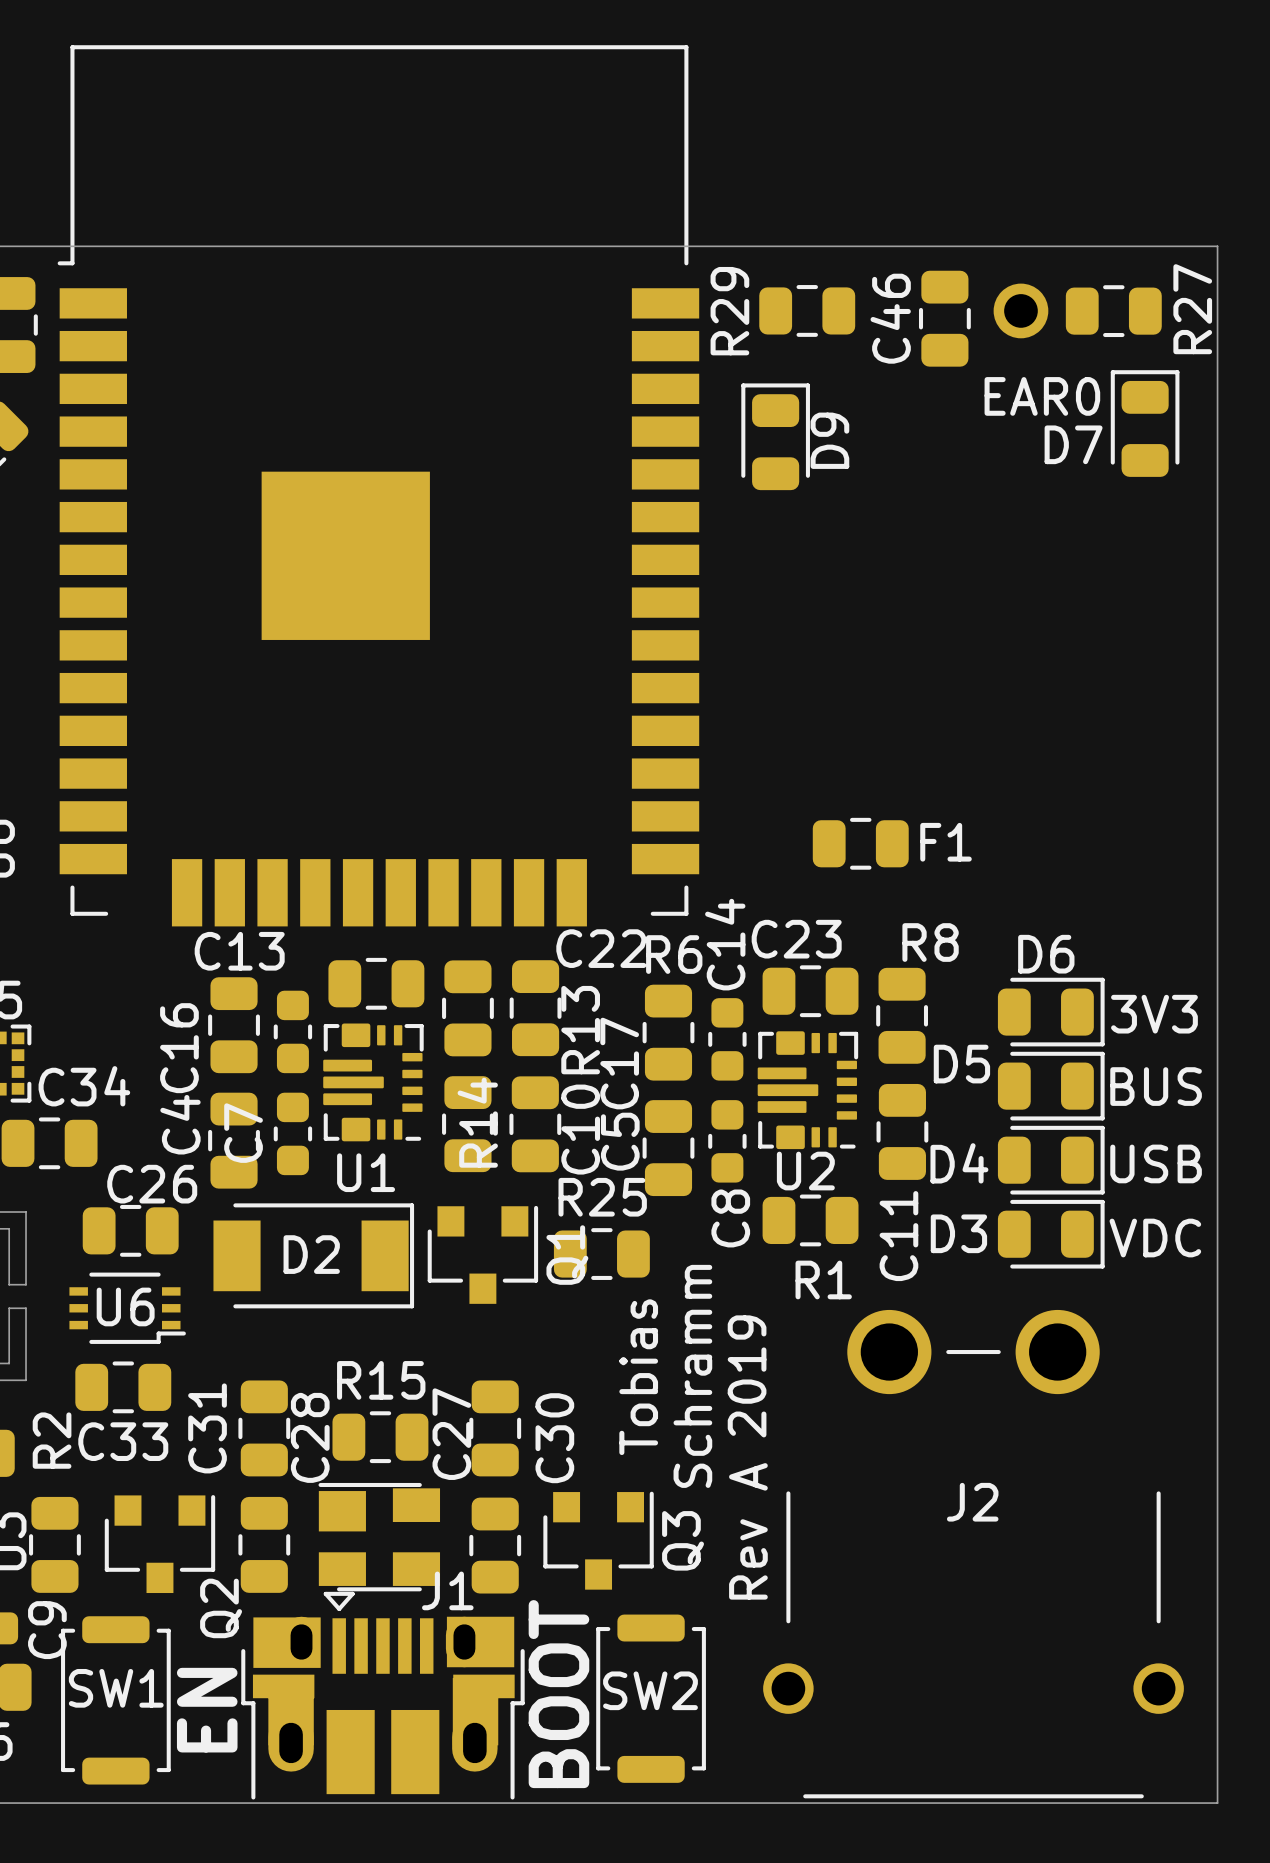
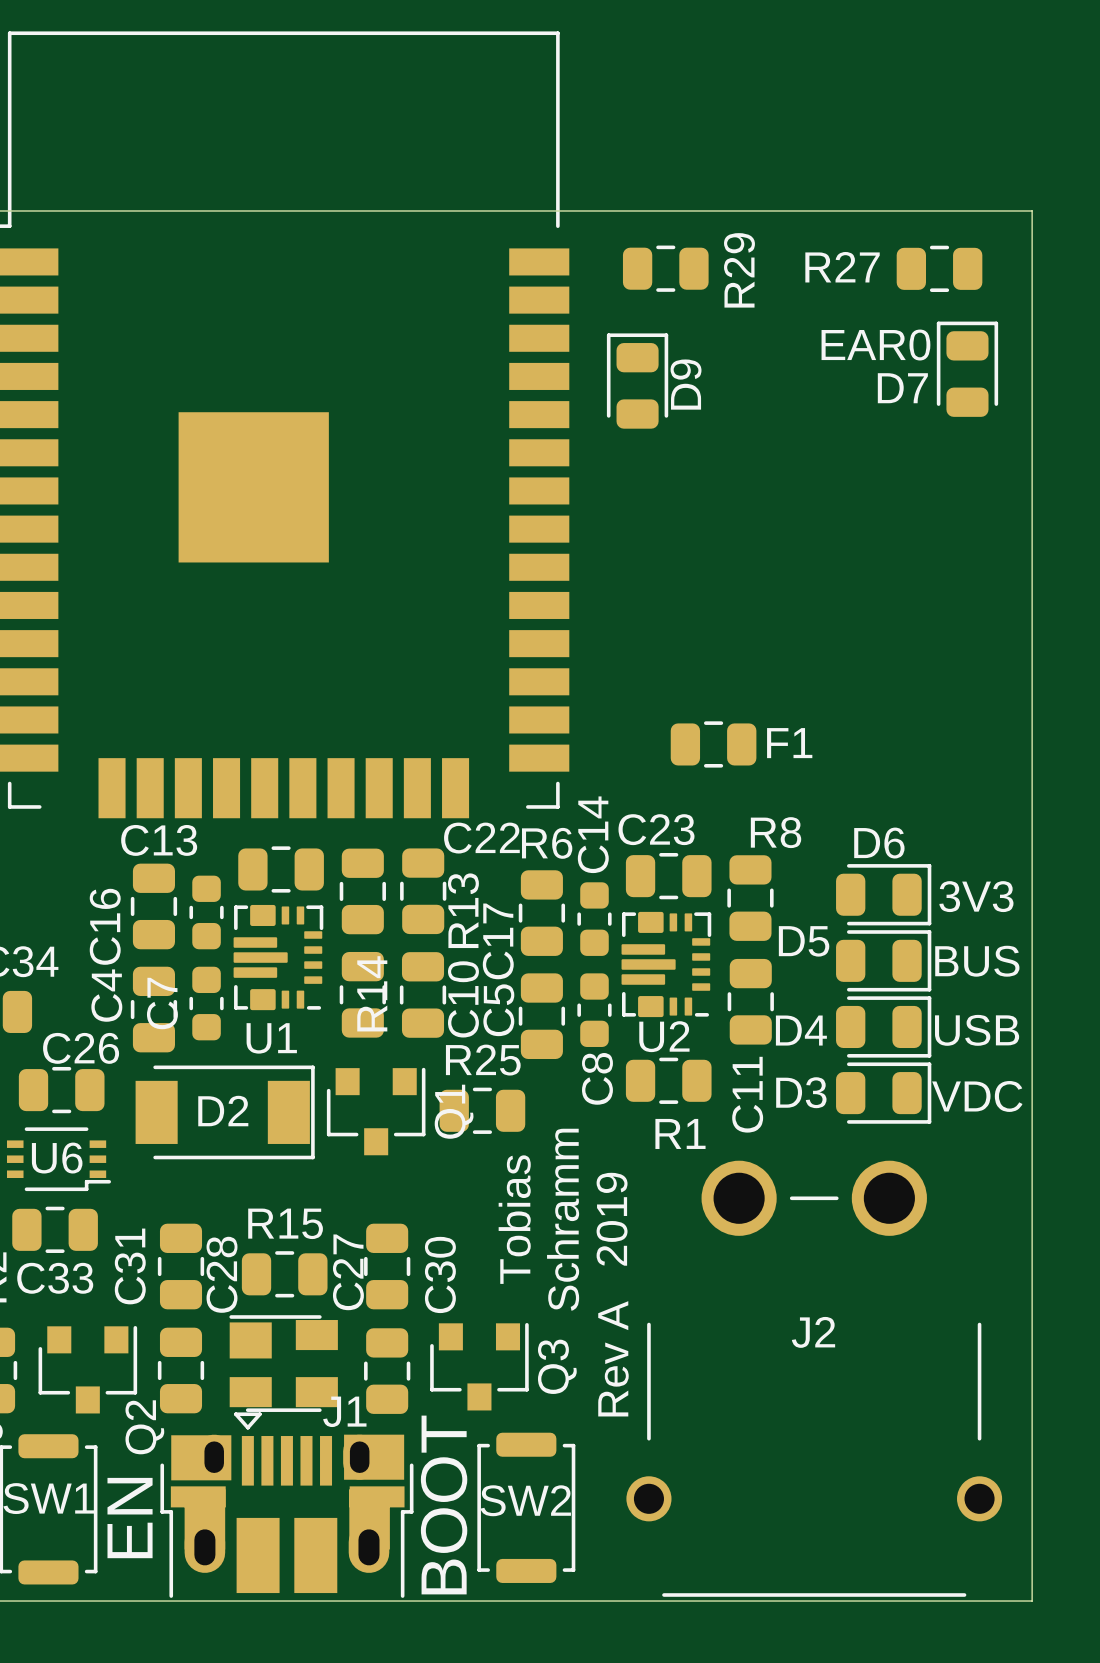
R27 name rotation: 0° (1192, 309) -> 90° clockwise (842, 267)
R27 name position: R27 (1192, 309) -> R27 (842, 267)
part: (1020, 310) -> none
R29 name position: R29 (729, 311) -> R29 (739, 270)
C46: (944, 318) -> none

